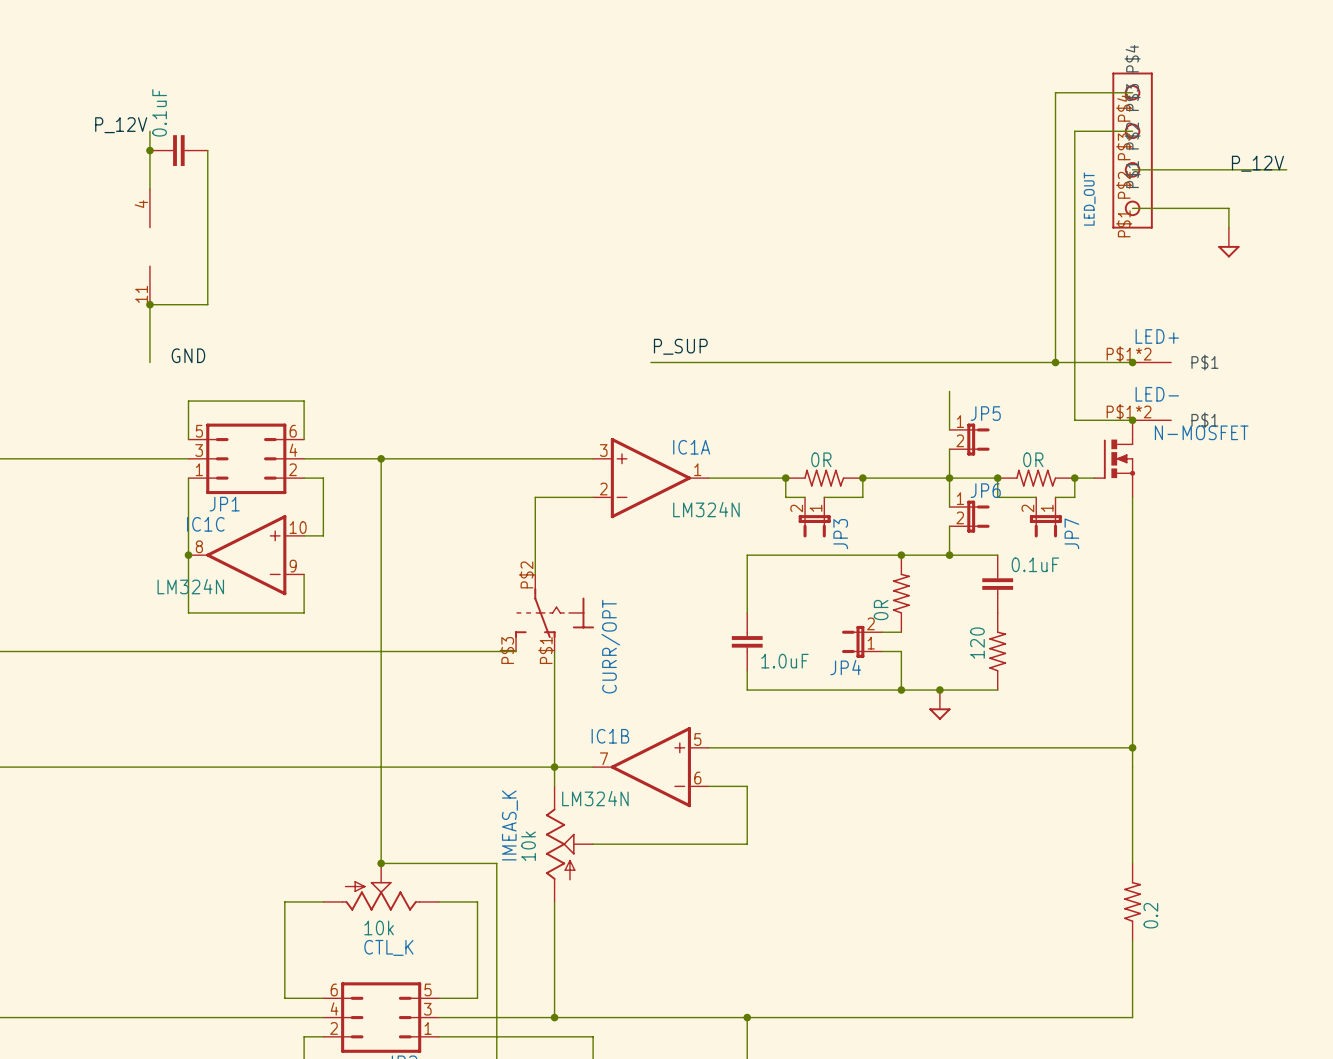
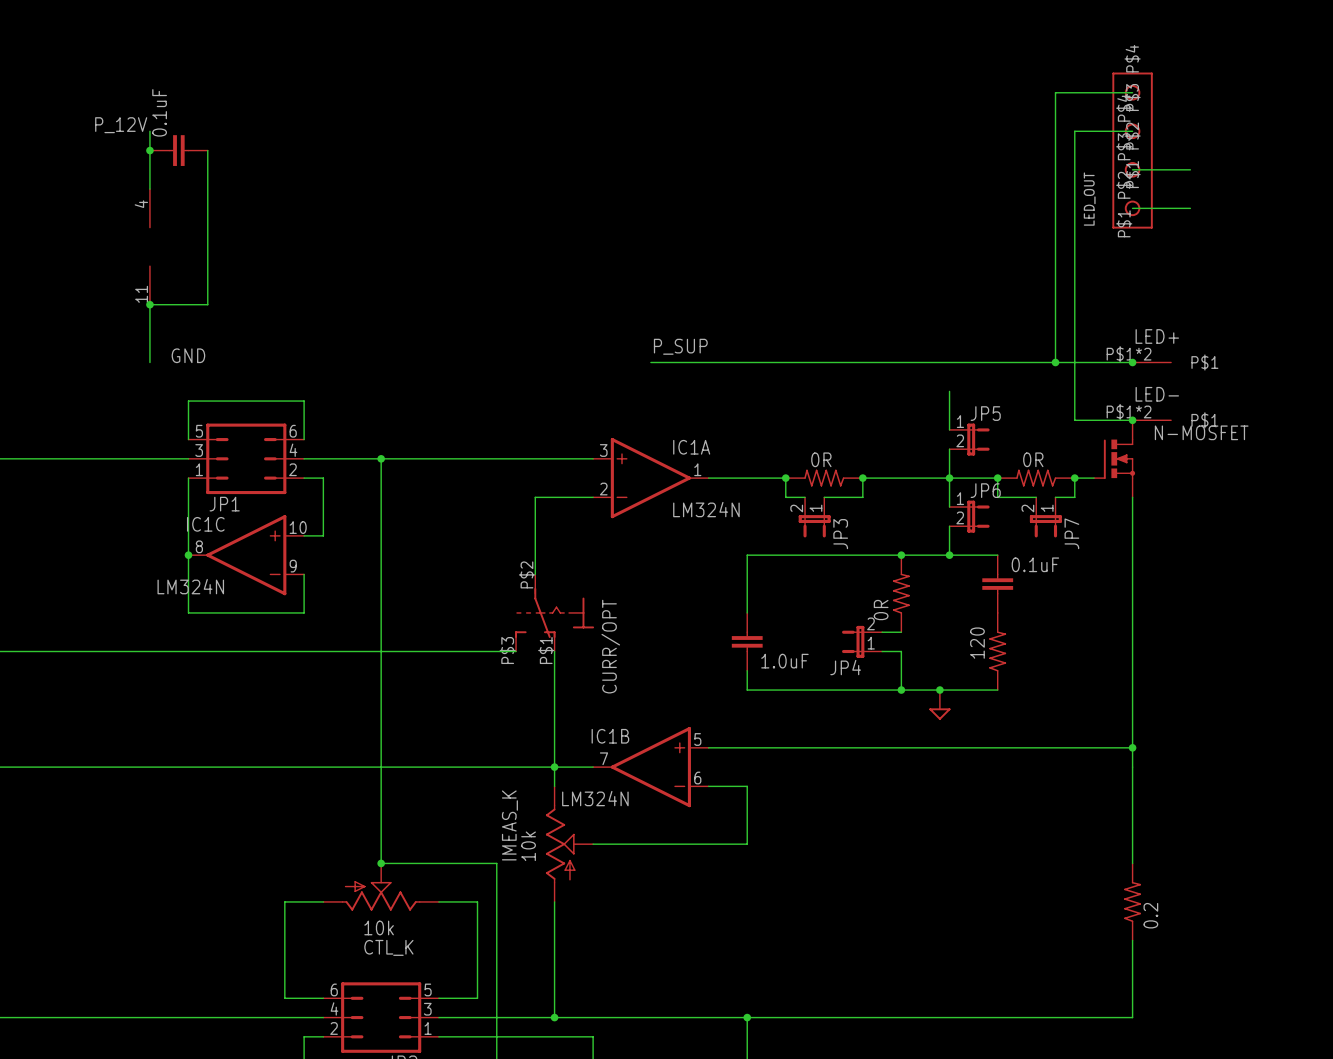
label: P_12V (1257, 163) -> none
wire: (1190, 169) (1286, 169) -> none
wire: (1190, 208) (1228, 208) (1228, 227) -> none
power symbol: (1228, 242) -> none

